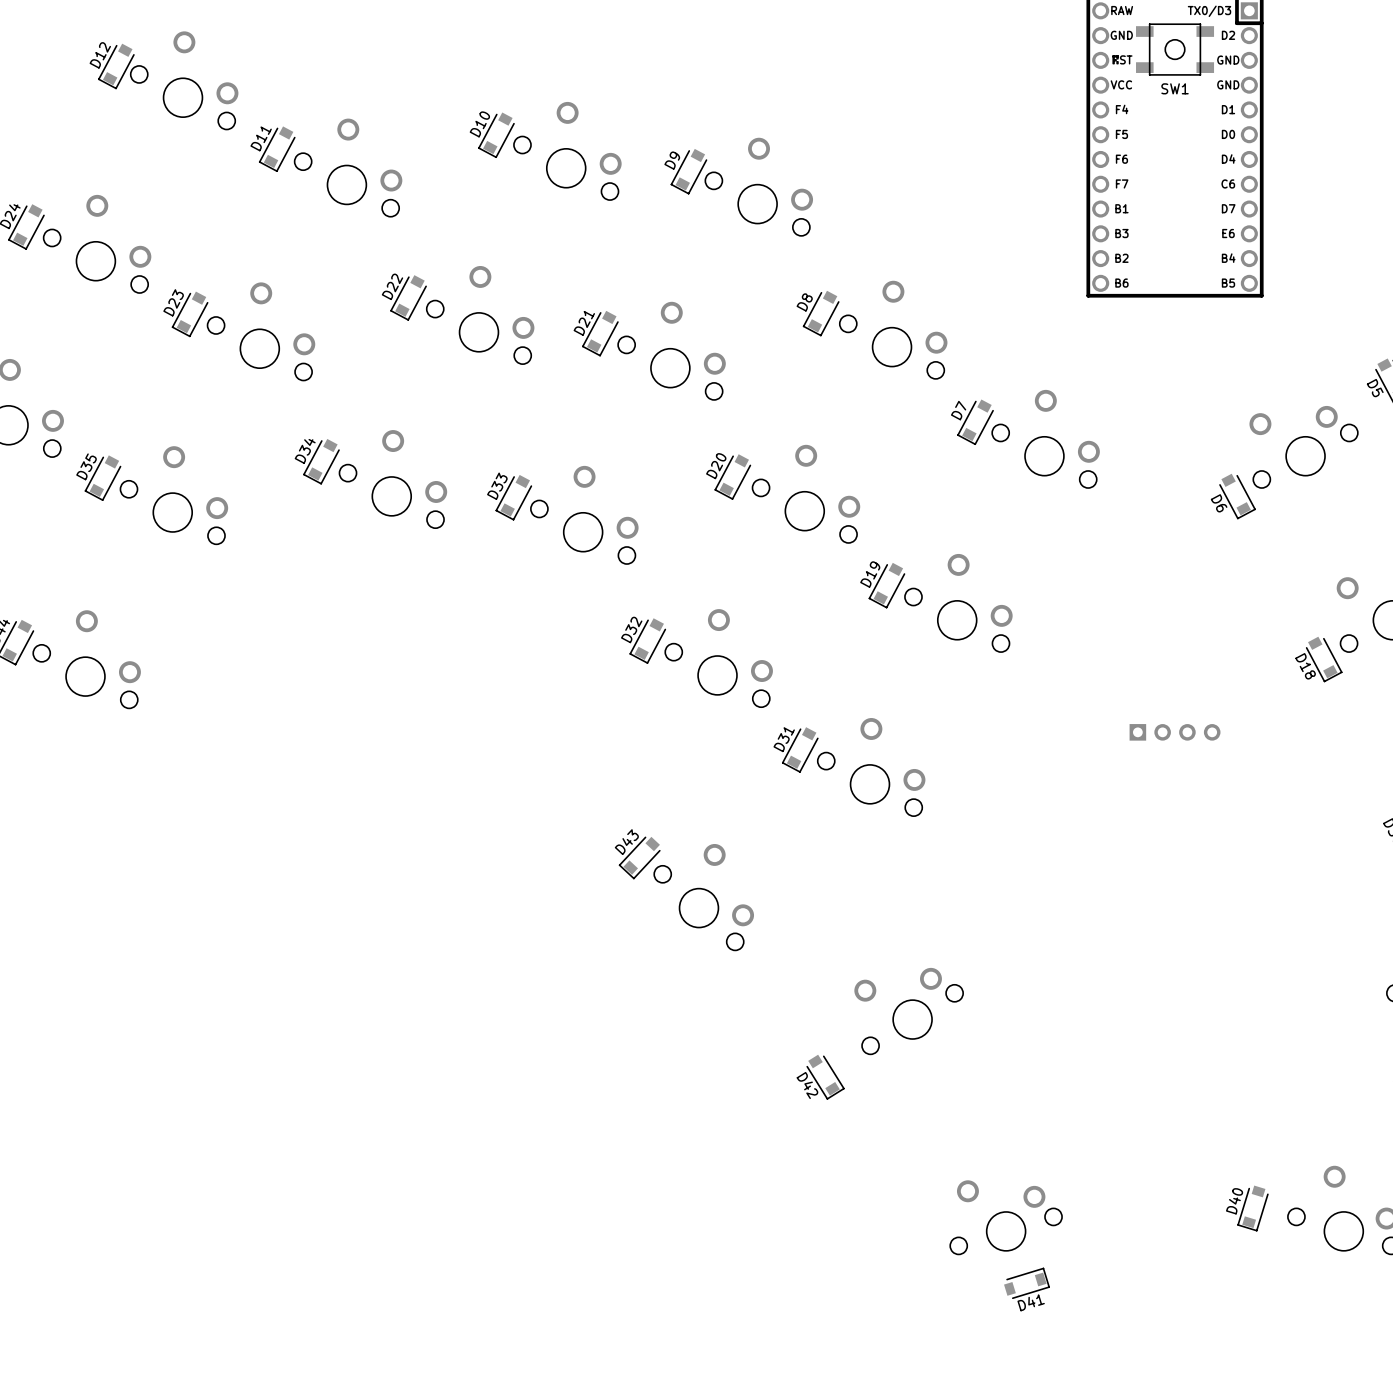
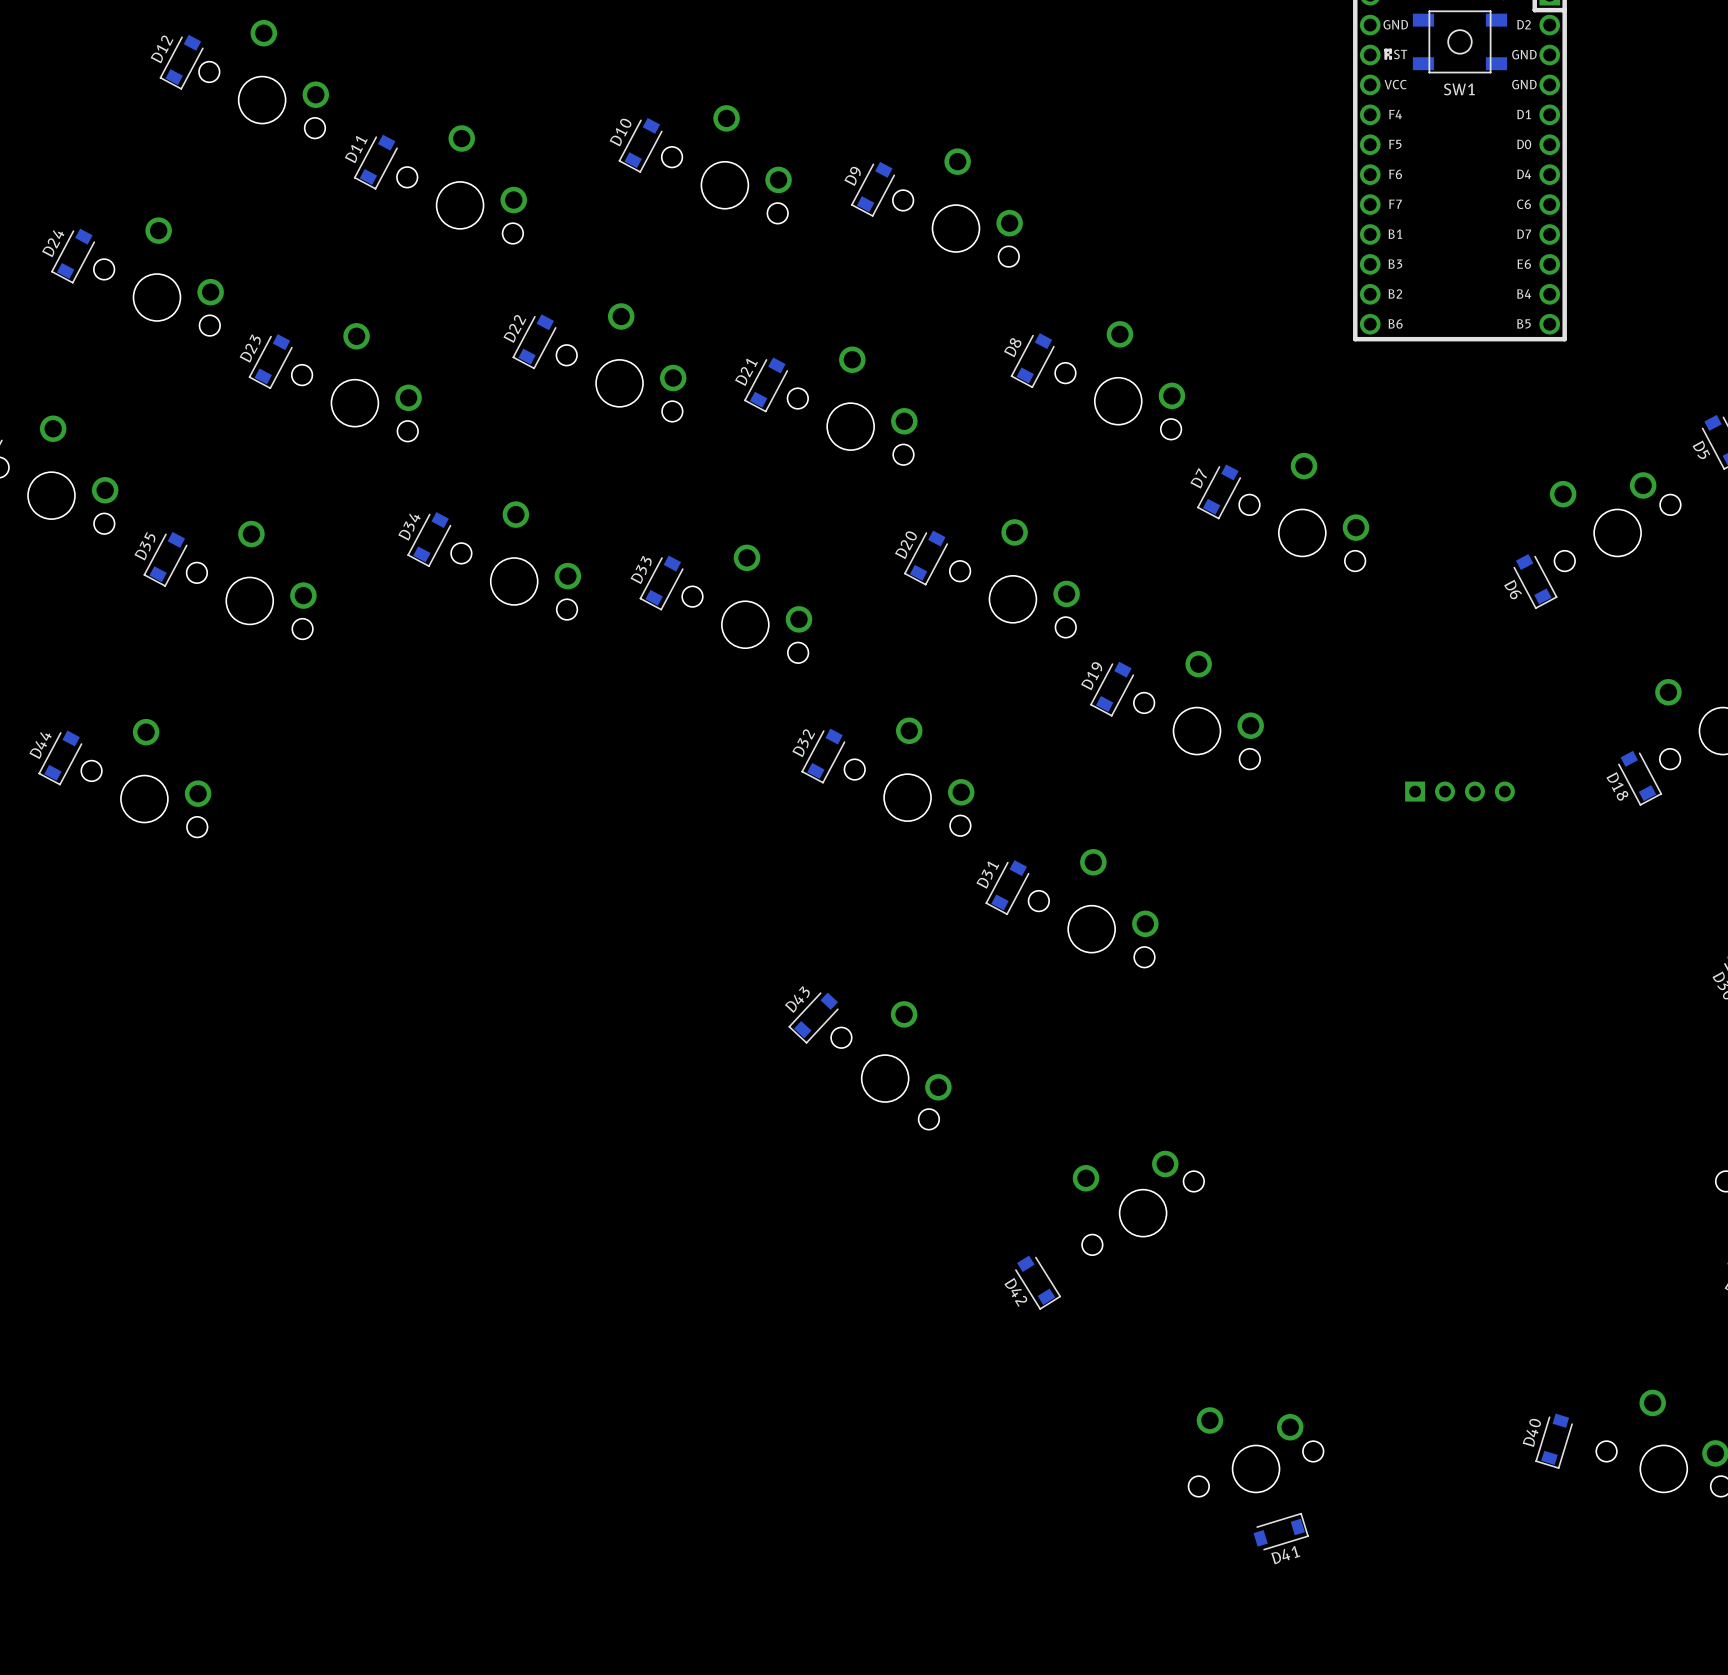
part position: (1175, 732) -> (1459, 791)

